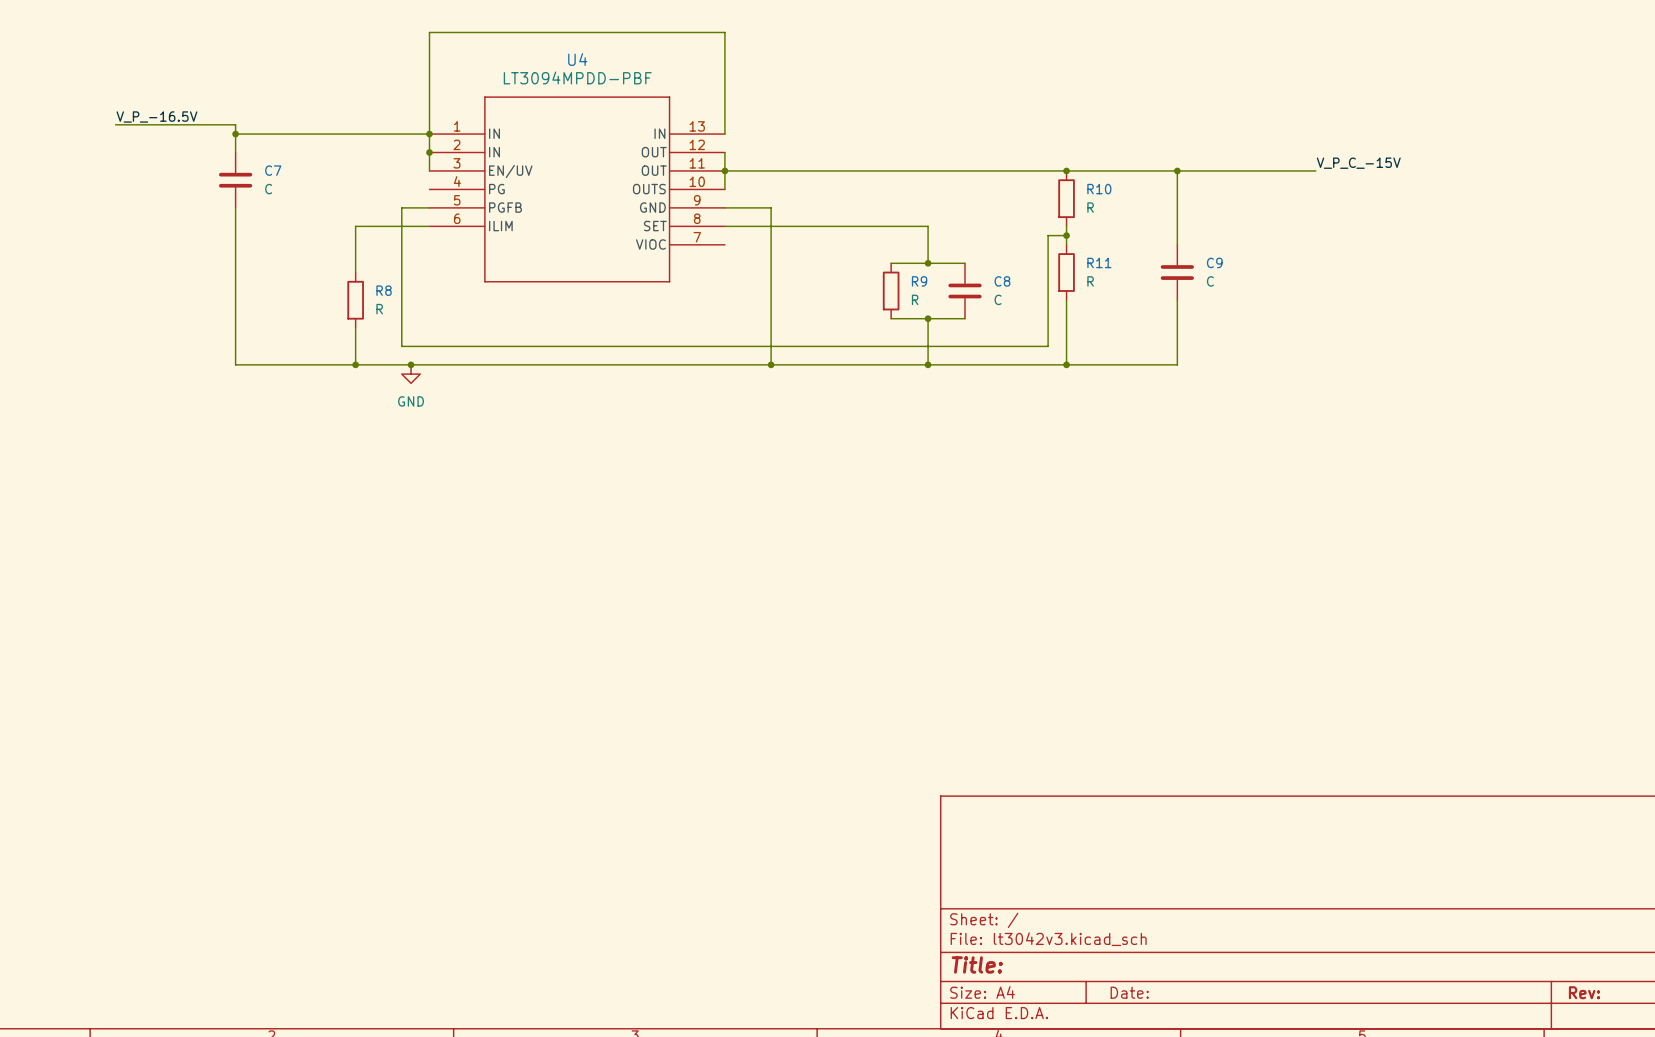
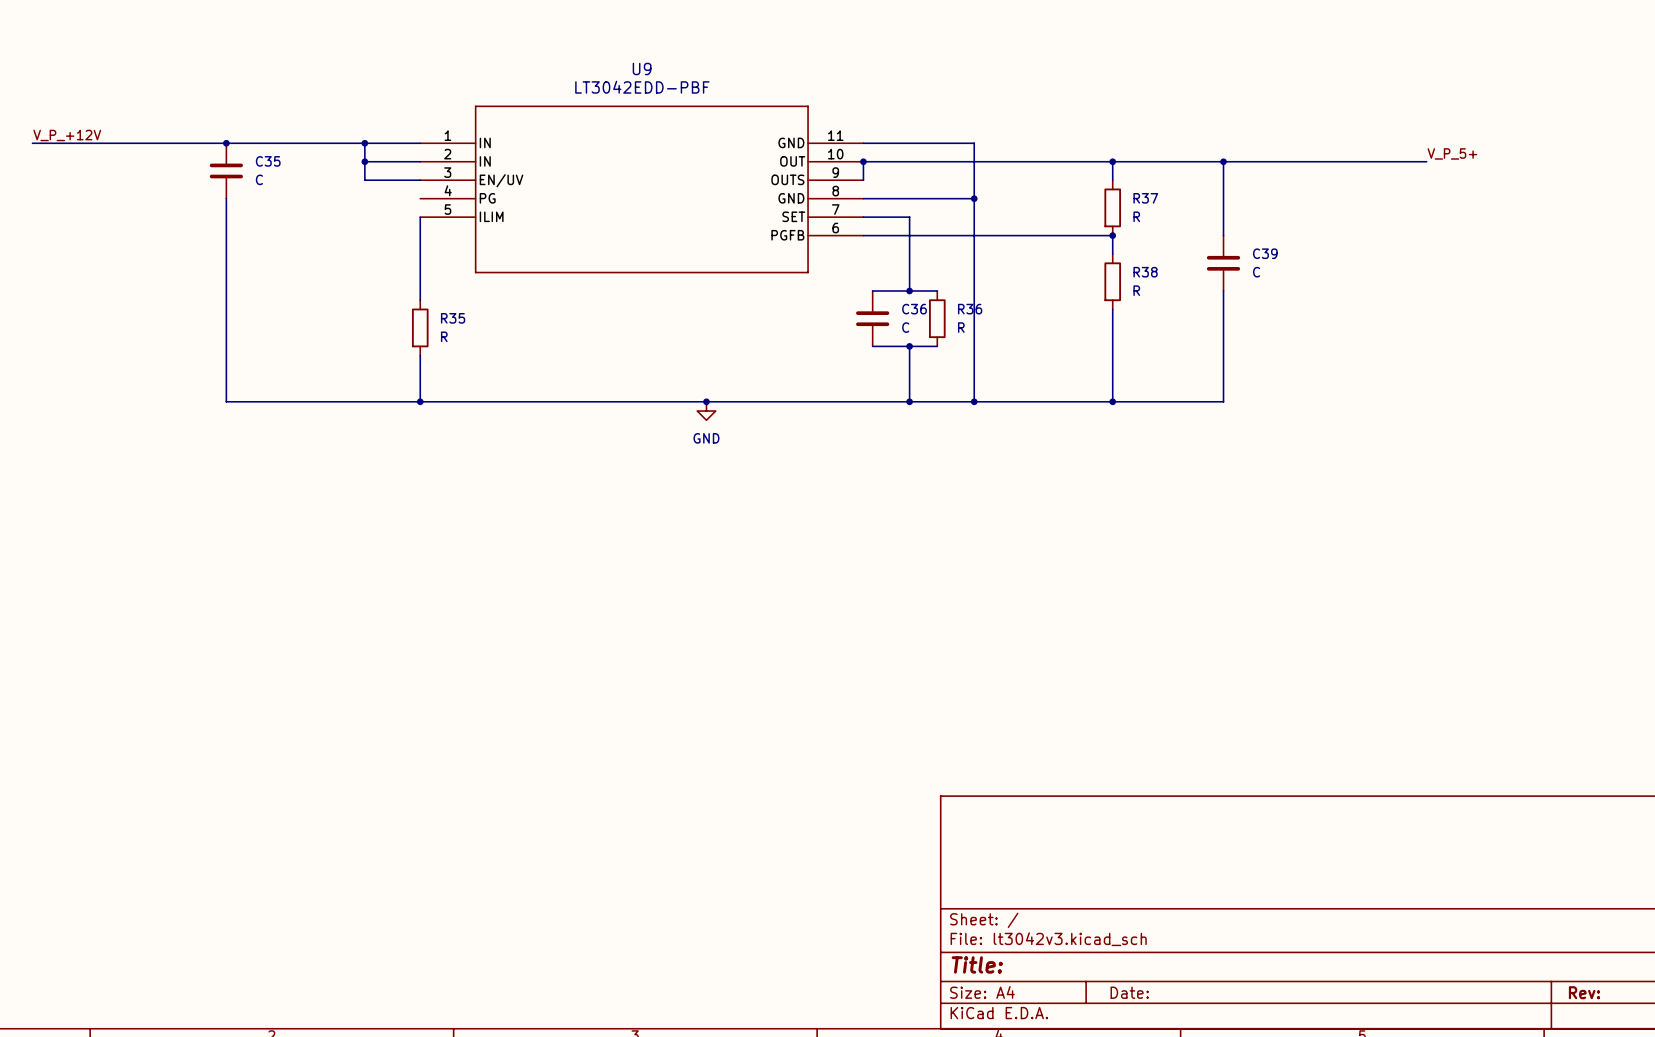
label: V_P_-16.5V (156, 117) -> none
wire: (115, 124) (235, 124) (235, 152) -> none
wire: (235, 134) (429, 134) -> none
junction position: (235, 134) -> (226, 143)
junction: (429, 134) -> none
wire: (724, 134) (724, 32) (429, 32) (429, 170) -> none
label: none -> V_P_+12V (67, 135)
wire: none -> (32, 143) (420, 143)
wire: none -> (364, 143) (364, 180) (420, 180)
junction: none -> (364, 143)
wire: none -> (863, 143) (974, 143) (974, 401)
junction: (429, 152) -> none
wire: (724, 152) (724, 189) -> none
label: none -> V_P_5+ (1452, 153)
wire: none -> (364, 161) (420, 161)
junction: none -> (364, 161)
junction: none -> (863, 161)
junction: none -> (1112, 161)
junction: none -> (1223, 161)
wire: none -> (1426, 161) (863, 161) (863, 180)
label: V_P_C_-15V (1358, 163) -> none
C35: none -> C (226, 170)
wire: (724, 170) (1315, 170) -> none
junction: (724, 170) -> none
junction: (1066, 170) -> none
wire: (1177, 170) (1177, 244) -> (1223, 161) (1223, 235)
junction: (1177, 170) -> none
C7: C (235, 180) -> none
U4: LT3094MPDD-PBF (577, 189) -> none
U9: none -> LT3042EDD-PBF (641, 189)
wire: none -> (226, 198) (226, 401) (1223, 401) (1223, 291)
wire: none -> (863, 198) (974, 198)
junction: none -> (974, 198)
R10: R (1066, 198) -> none
wire: (235, 207) (235, 364) (1177, 364) (1177, 300) -> none
wire: (429, 207) (401, 207) (401, 346) (872, 346) -> none
wire: (724, 207) (771, 207) (771, 364) -> none
R37: none -> R (1112, 207)
wire: none -> (420, 217) (420, 300)
wire: none -> (863, 217) (909, 217) (909, 291)
wire: (429, 226) (355, 226) (355, 272) -> none
wire: (724, 226) (928, 226) (928, 263) -> none
wire: (1066, 226) (1066, 244) -> (1112, 161) (1112, 180)
wire: (1048, 235) (1048, 346) (937, 346) -> (1048, 235) (863, 235)
wire: none -> (1066, 235) (1112, 235) (1112, 254)
junction: (1066, 235) -> none
junction: none -> (1112, 235)
wire: (891, 263) (964, 263) -> none
junction: (928, 263) -> none
C39: none -> C (1223, 263)
R11: R (1066, 272) -> none
C9: C (1177, 272) -> none
R38: none -> R (1112, 281)
wire: none -> (872, 291) (937, 291)
R9: R (891, 291) -> none
junction: none -> (909, 291)
C8: C (964, 291) -> none
R8: R (355, 300) -> none
wire: (1066, 300) (1066, 364) -> none
wire: none -> (1112, 309) (1112, 401)
C36: none -> C (872, 318)
wire: (891, 318) (964, 318) -> none
wire: (928, 318) (928, 364) -> none
junction: (928, 318) -> none
R36: none -> R (937, 318)
wire: (355, 327) (355, 364) -> none
R35: none -> R (420, 327)
wire: none -> (909, 346) (909, 401)
junction: none -> (909, 346)
wire: none -> (420, 355) (420, 401)
junction: (355, 364) -> none
junction: (411, 364) -> none
junction: (771, 364) -> none
junction: (928, 364) -> none
junction: (1066, 364) -> none
power symbol: GND (411, 374) -> none
junction: none -> (420, 401)
junction: none -> (706, 401)
junction: none -> (909, 401)
junction: none -> (974, 401)
junction: none -> (1112, 401)
power symbol: none -> GND (706, 411)

